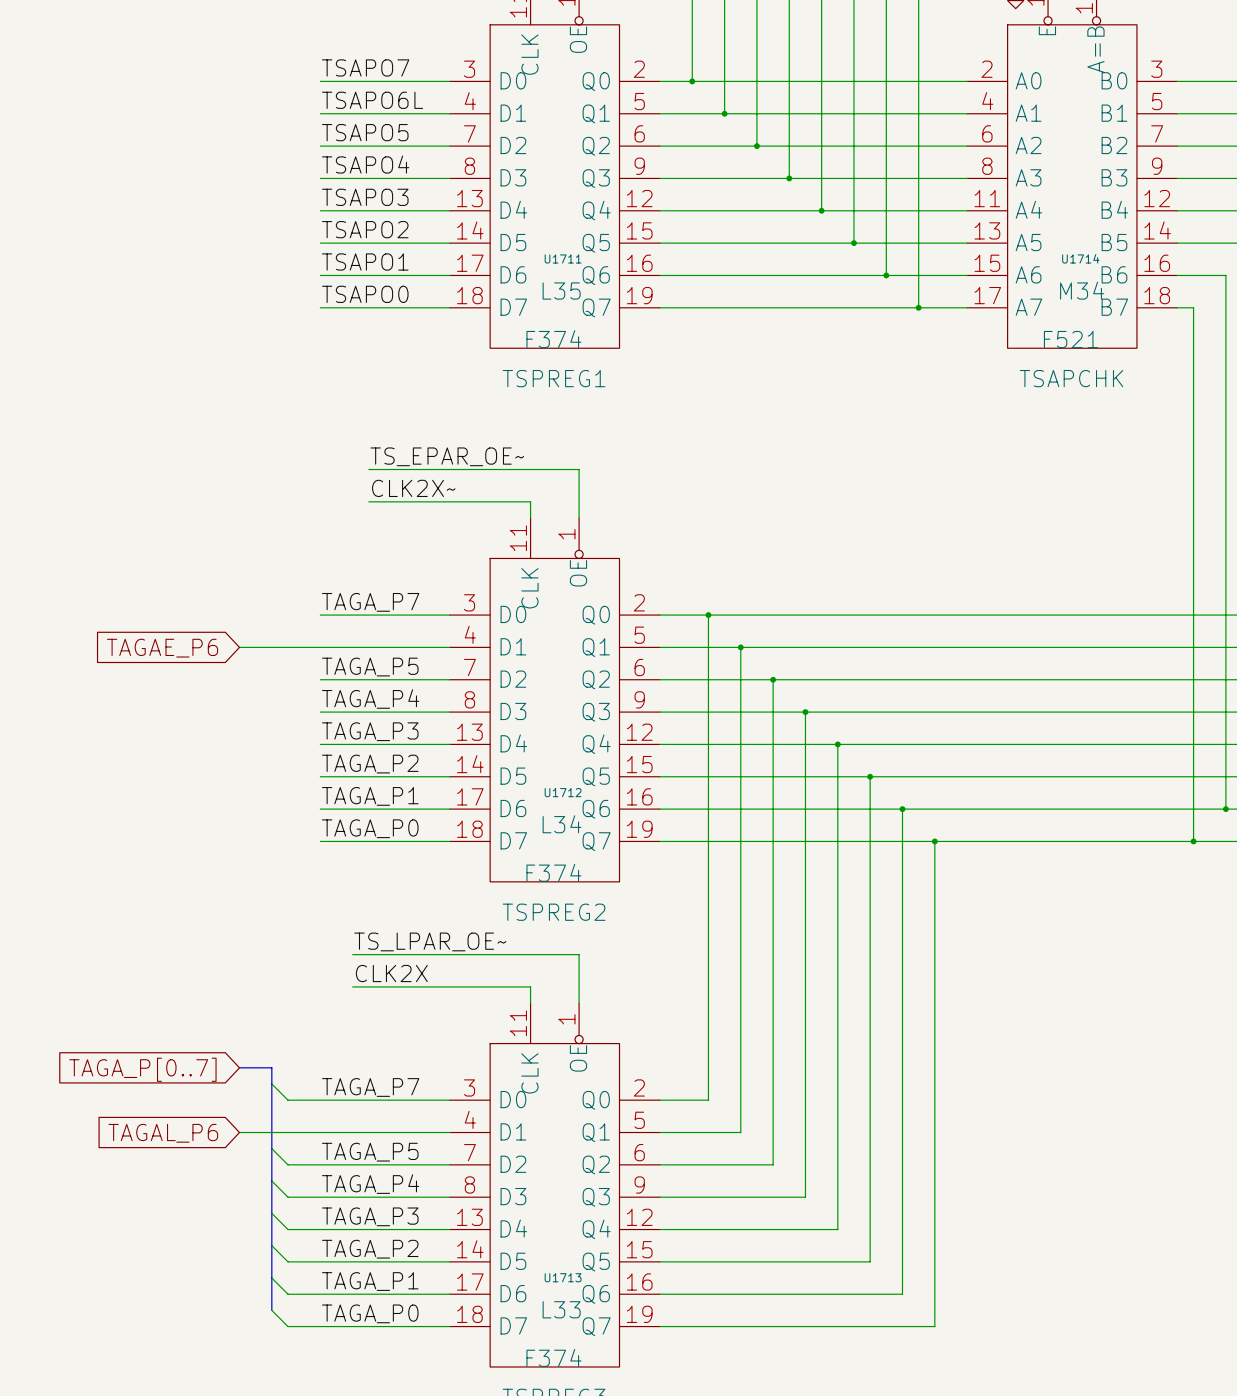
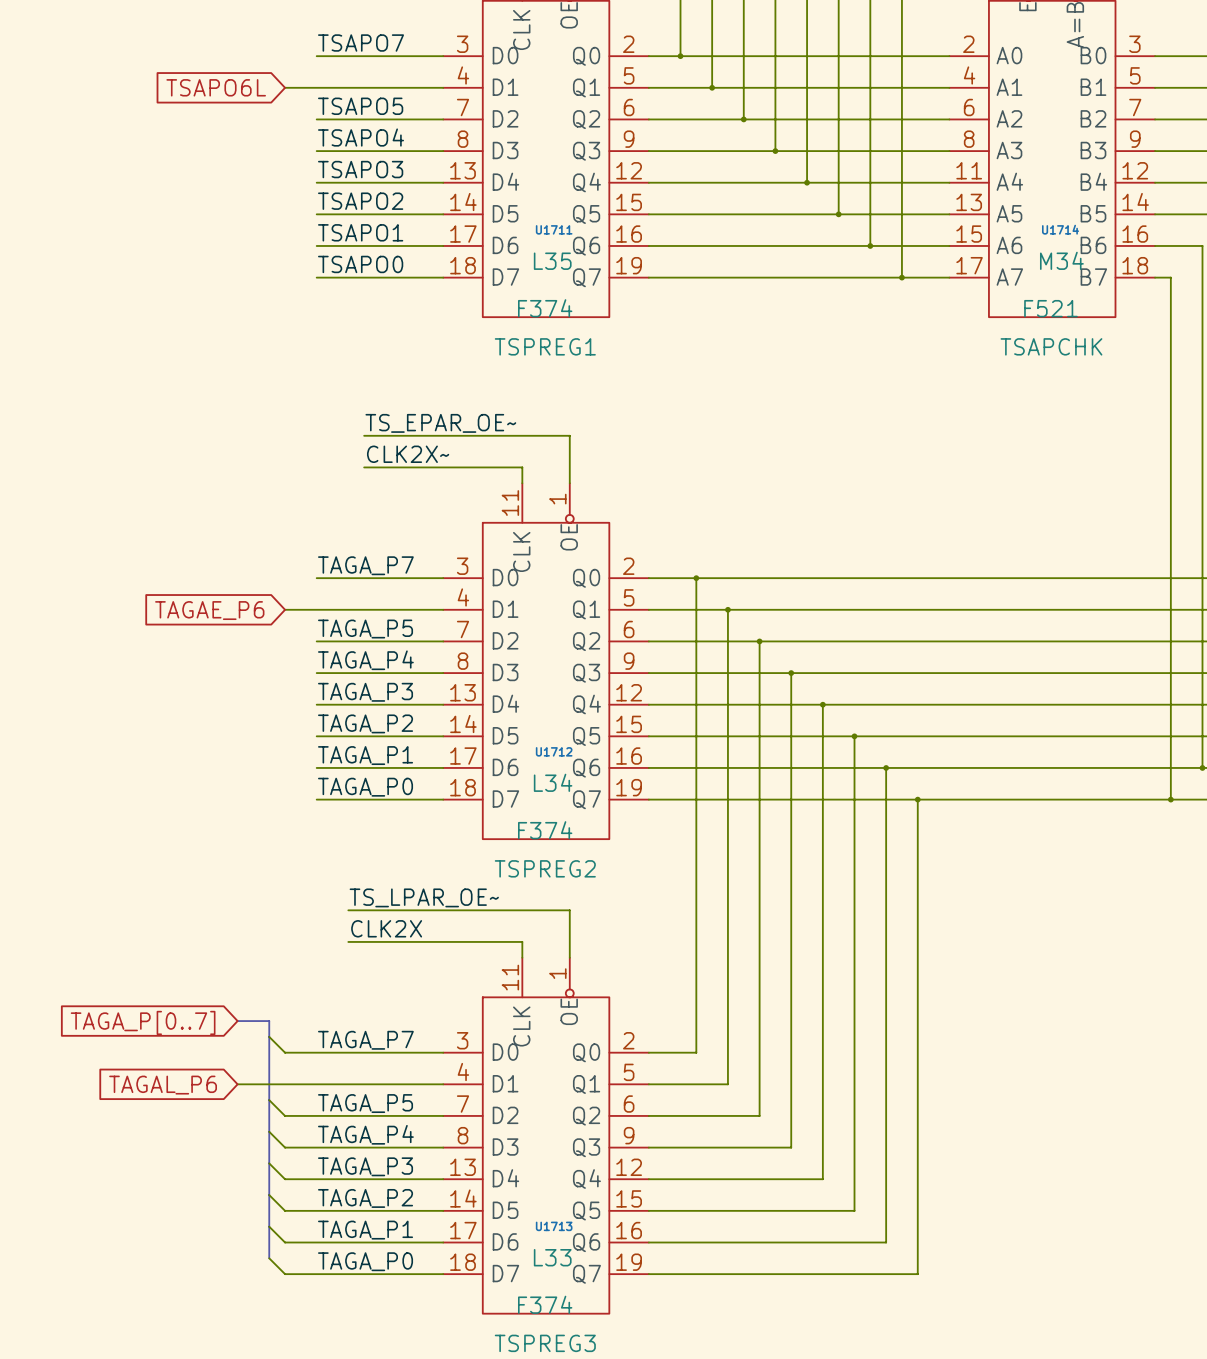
label: TSAPO6L (372, 100) -> none
global label: none -> TSAPO6L (216, 87)
wire: none -> (285, 87) (316, 87)
wire: (239, 647) (288, 647) -> none
global label position: TAGAE_P6 (162, 648) -> TAGAE_P6 (209, 610)

